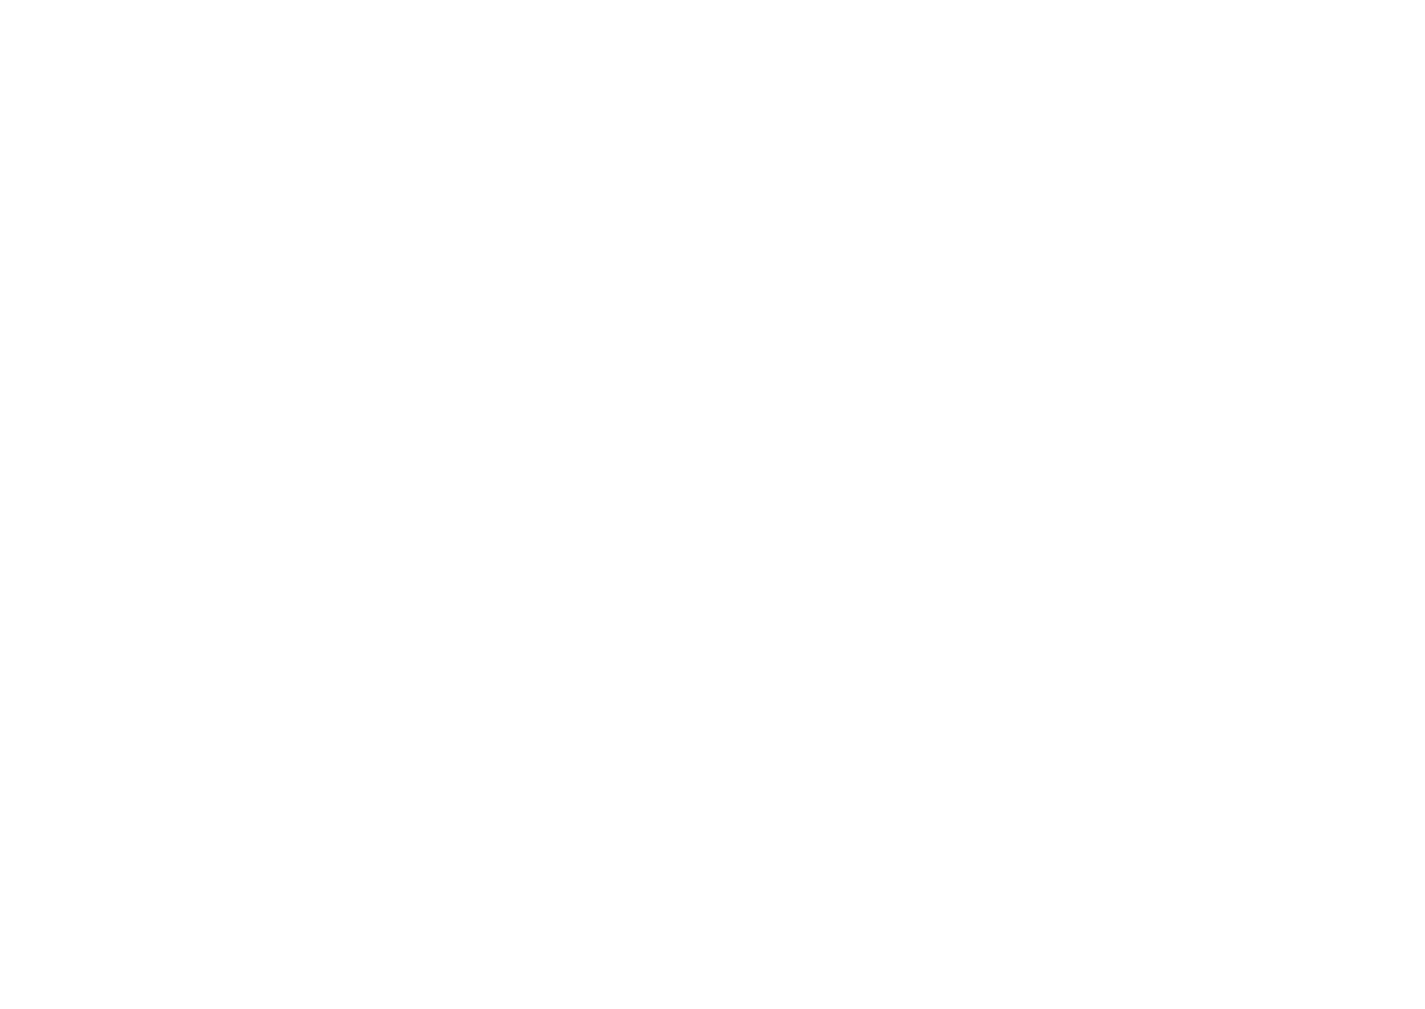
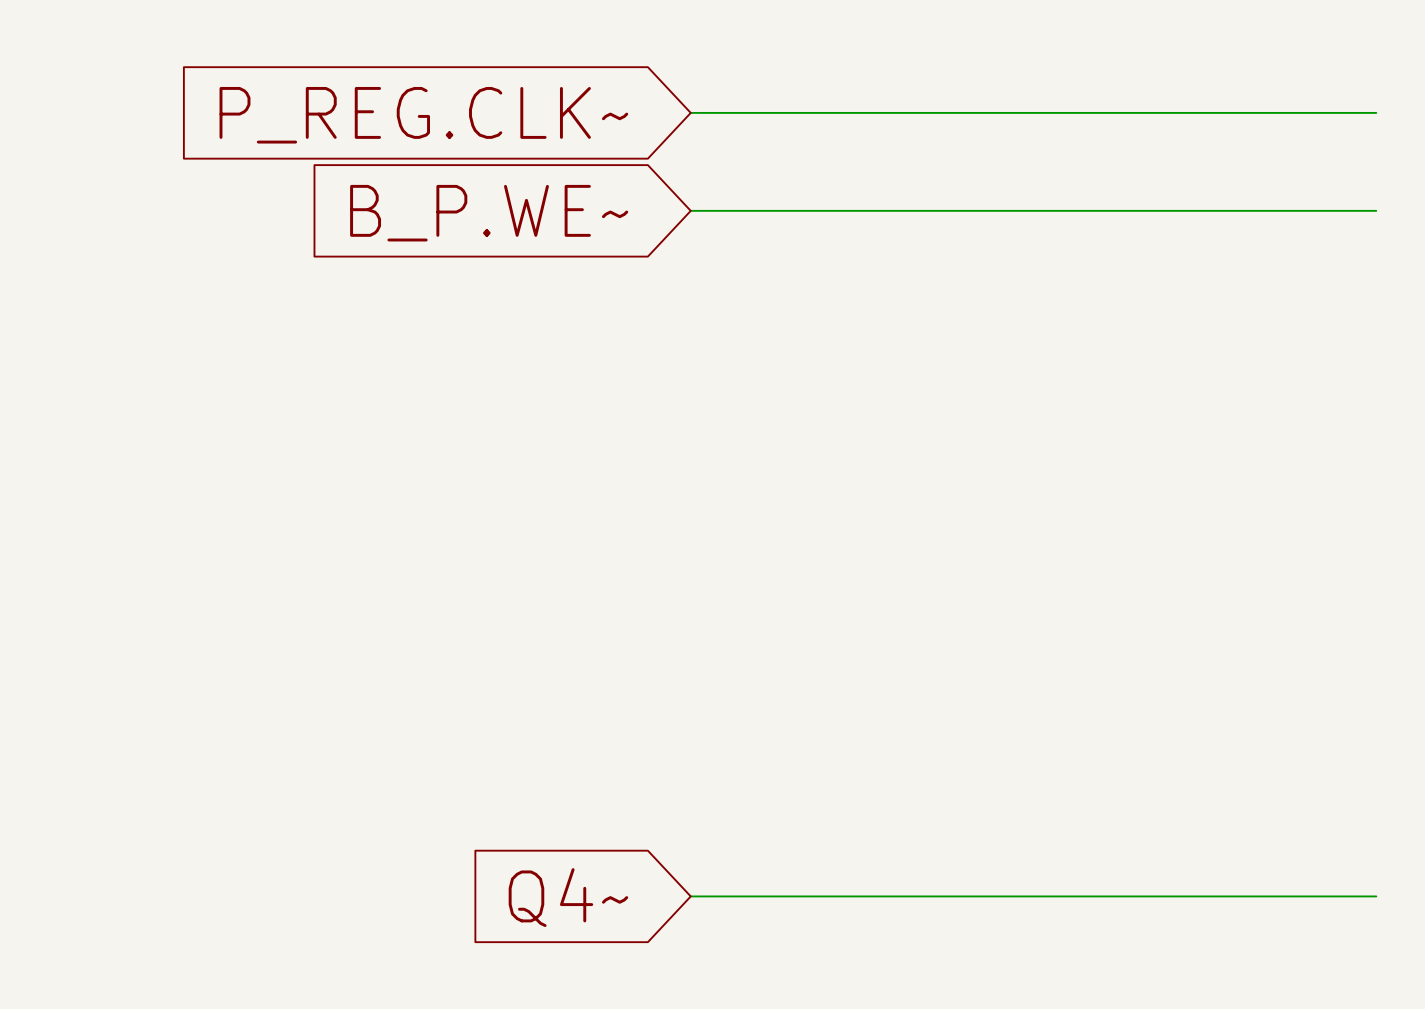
wire: none -> (690, 112) (1376, 112)
global label: none -> P_REG.CLK~ (423, 115)
wire: none -> (690, 210) (1376, 210)
global label: none -> B_P.WE~ (489, 213)
wire: none -> (690, 896) (1376, 896)
global label: none -> Q4~ (568, 897)

